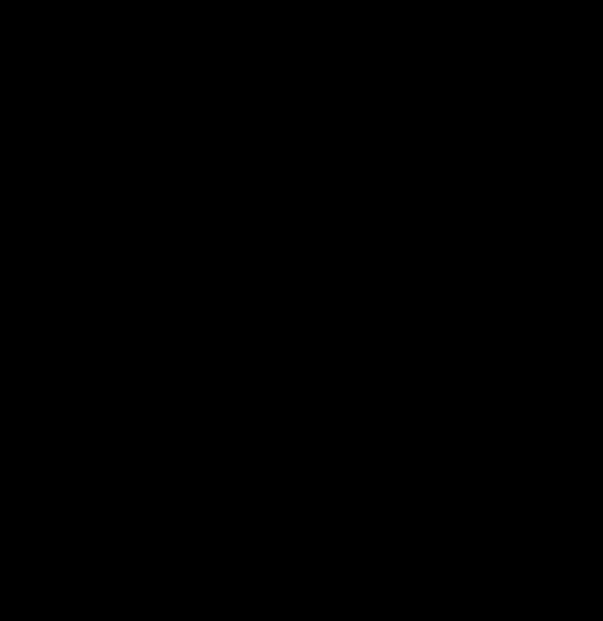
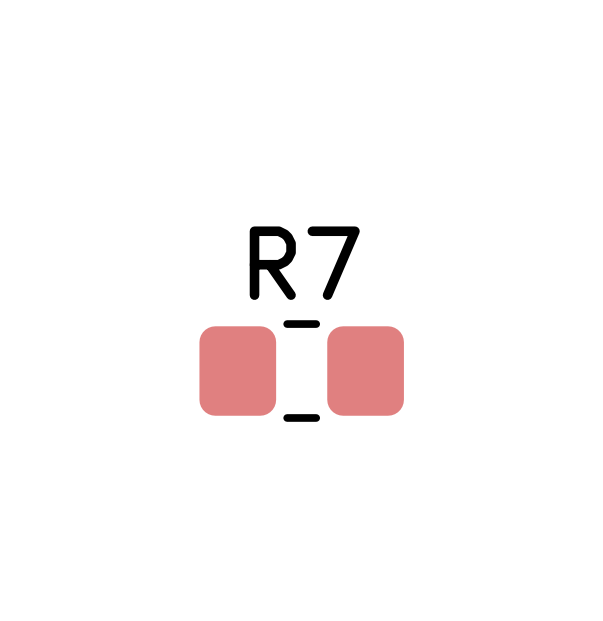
R7: none -> (301, 371)

